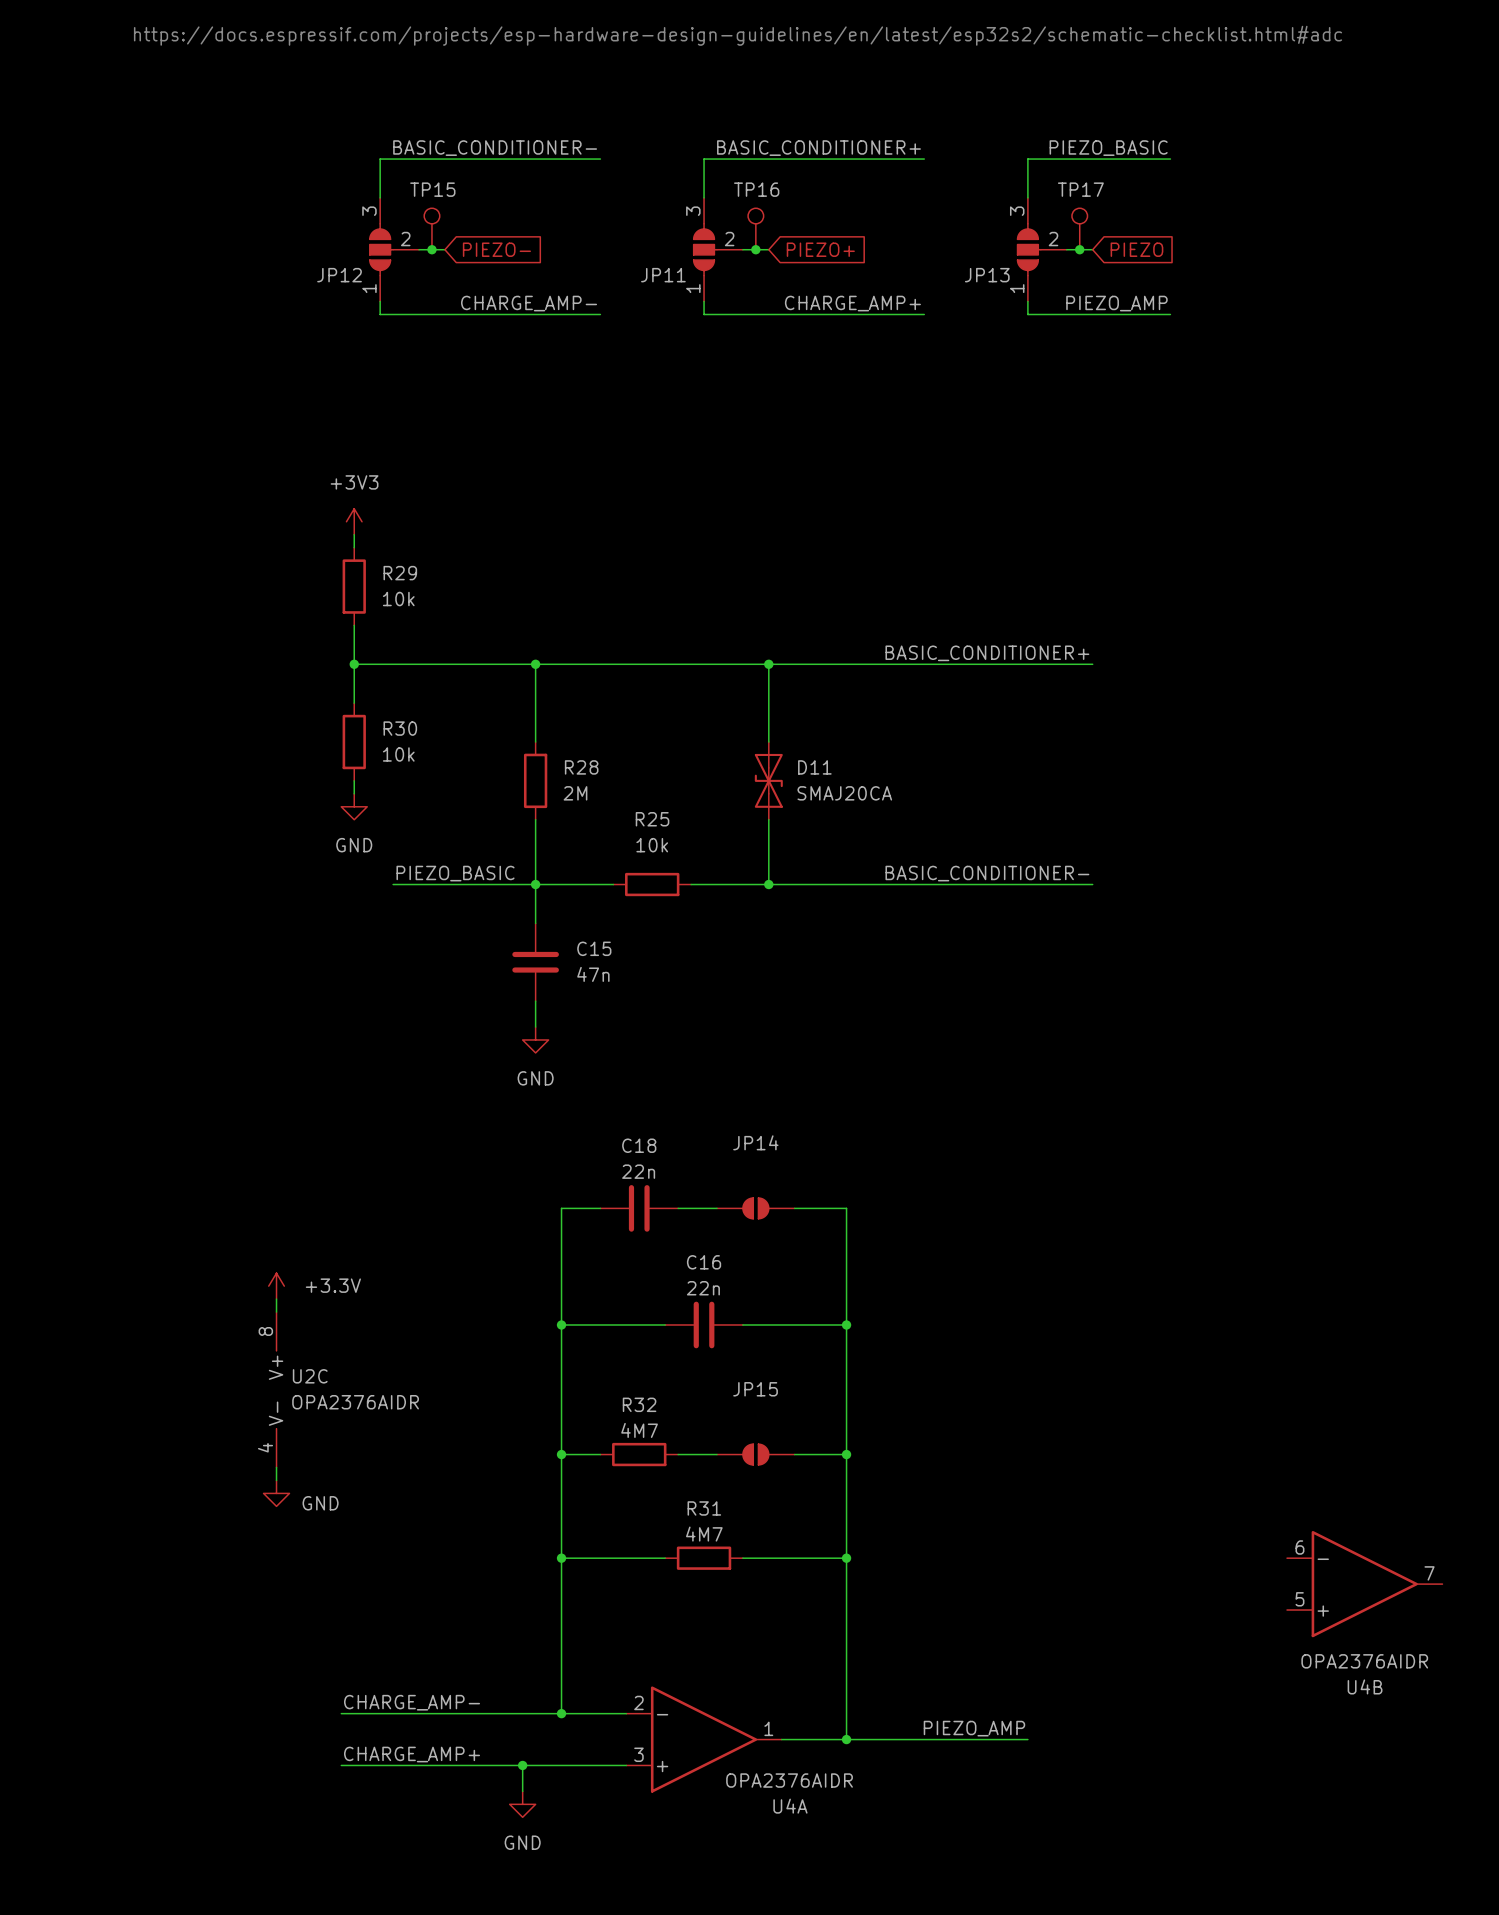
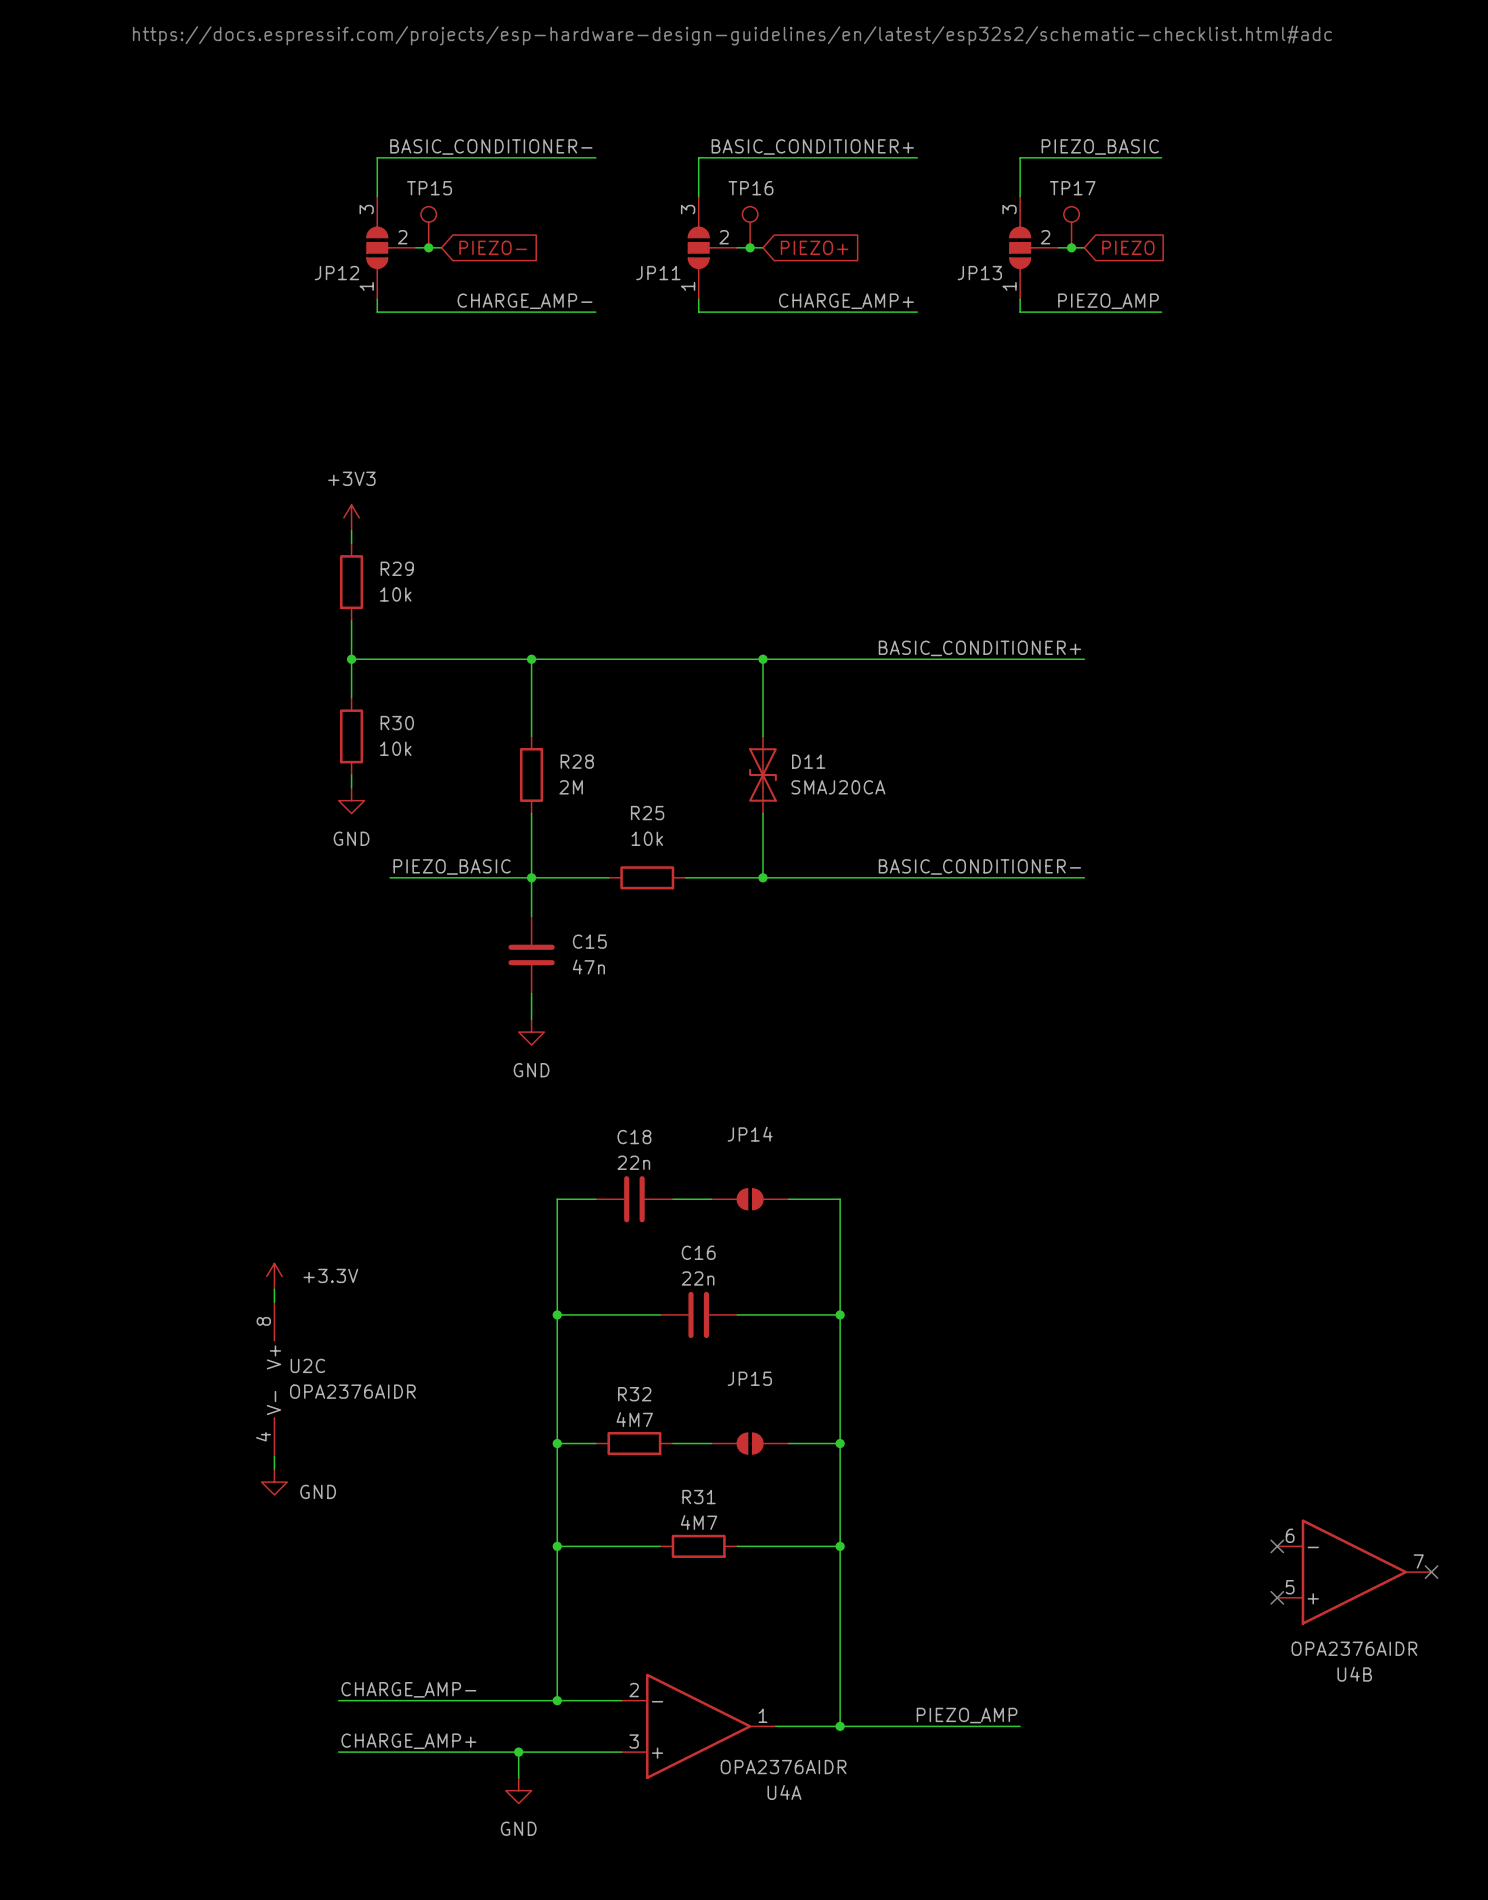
no-connect mark: none -> (1277, 1546)
no-connect mark: none -> (1431, 1572)
no-connect mark: none -> (1277, 1597)

